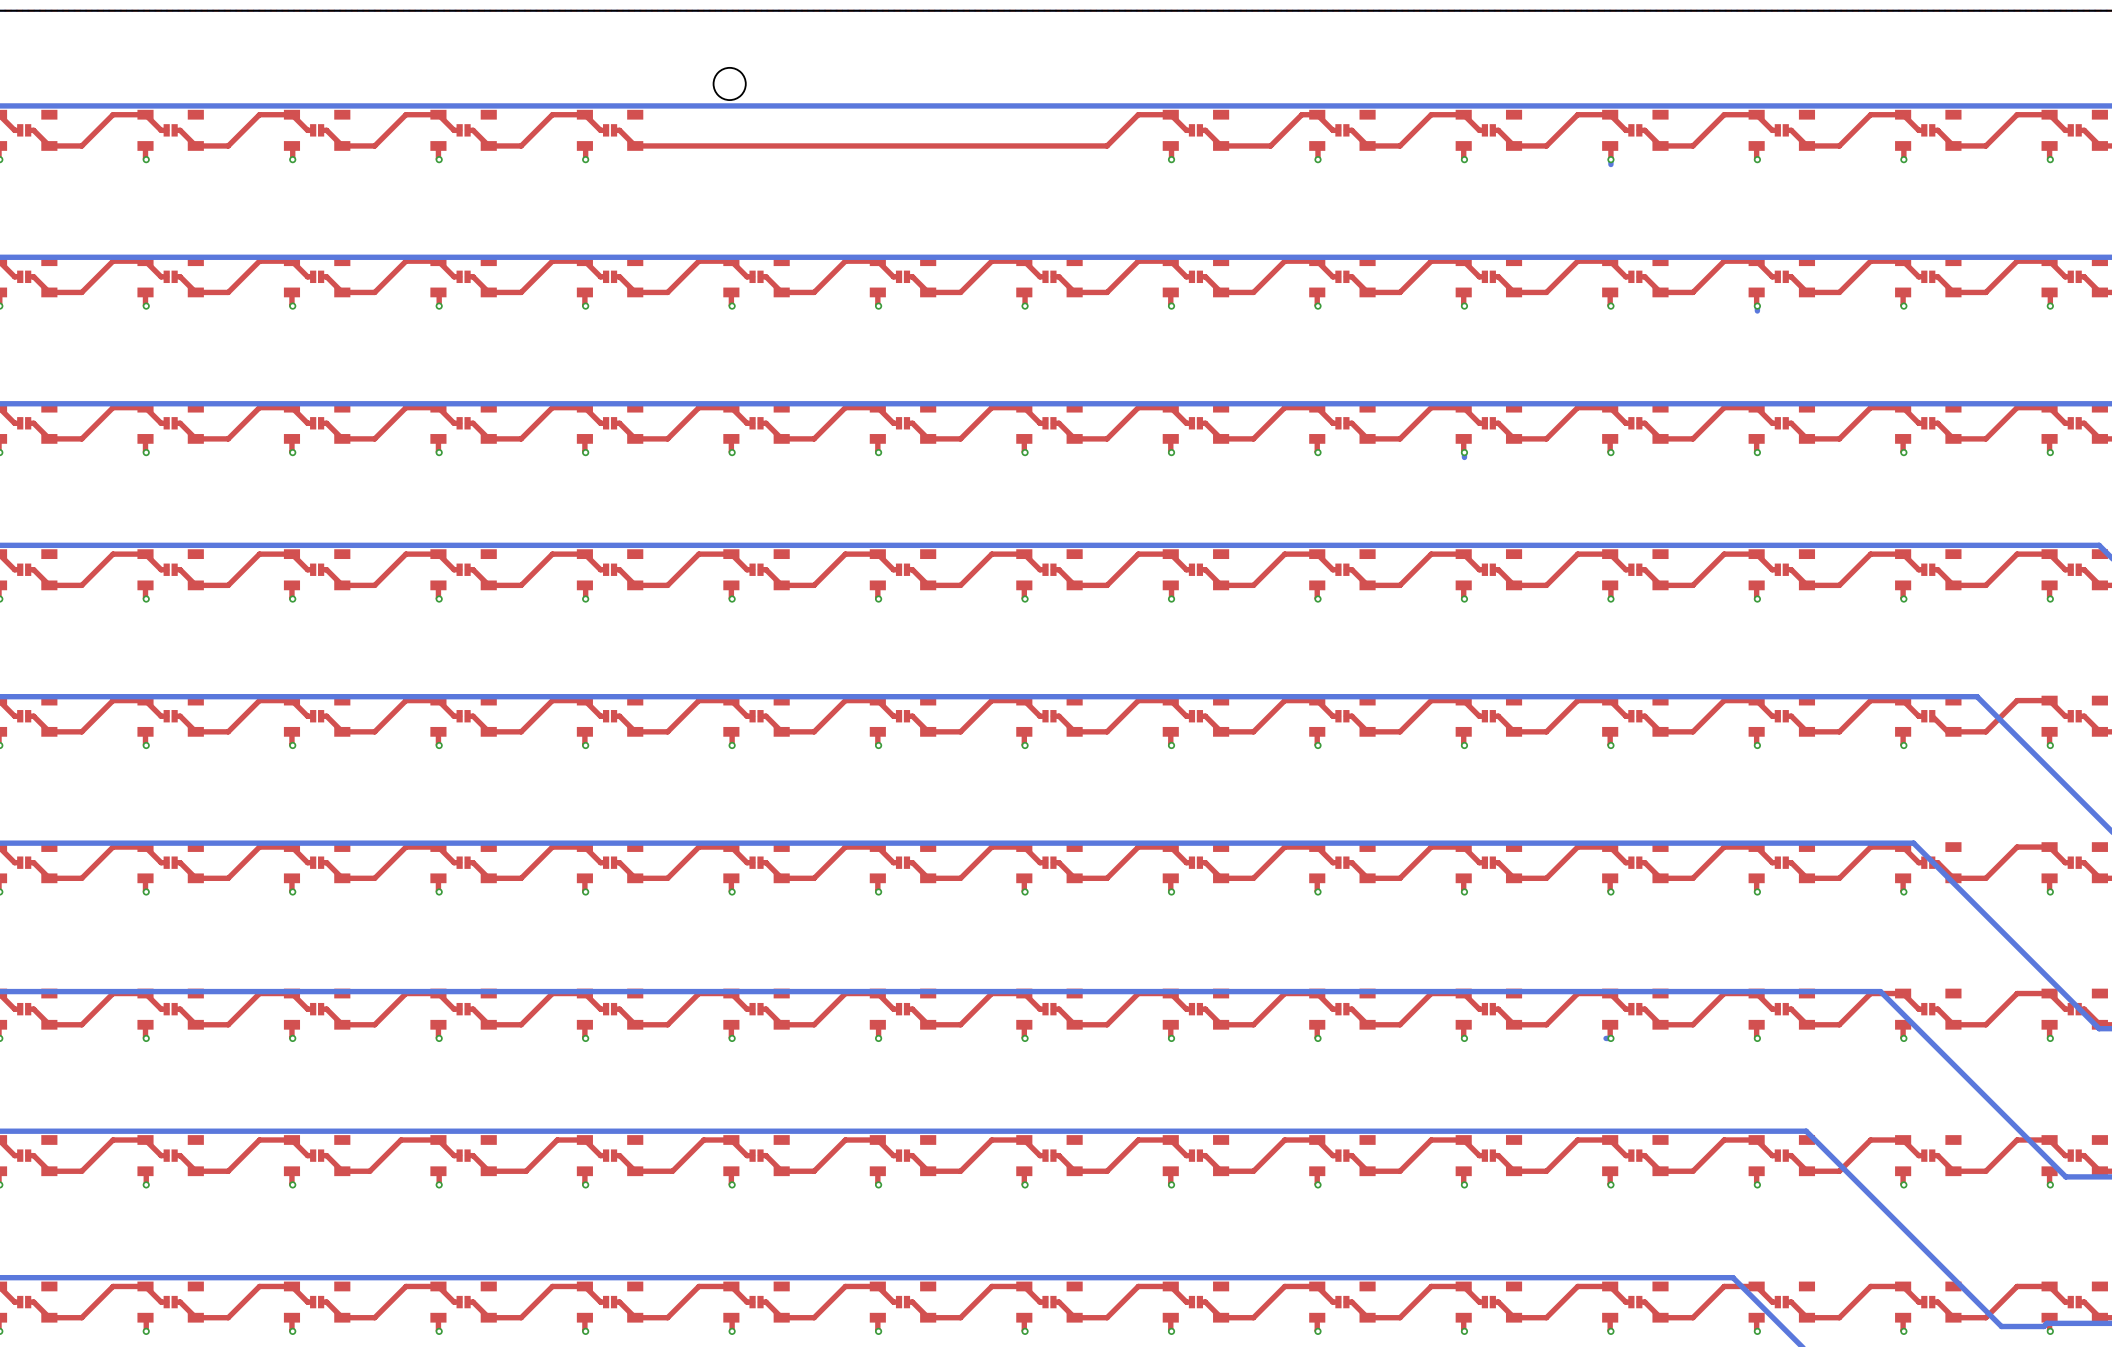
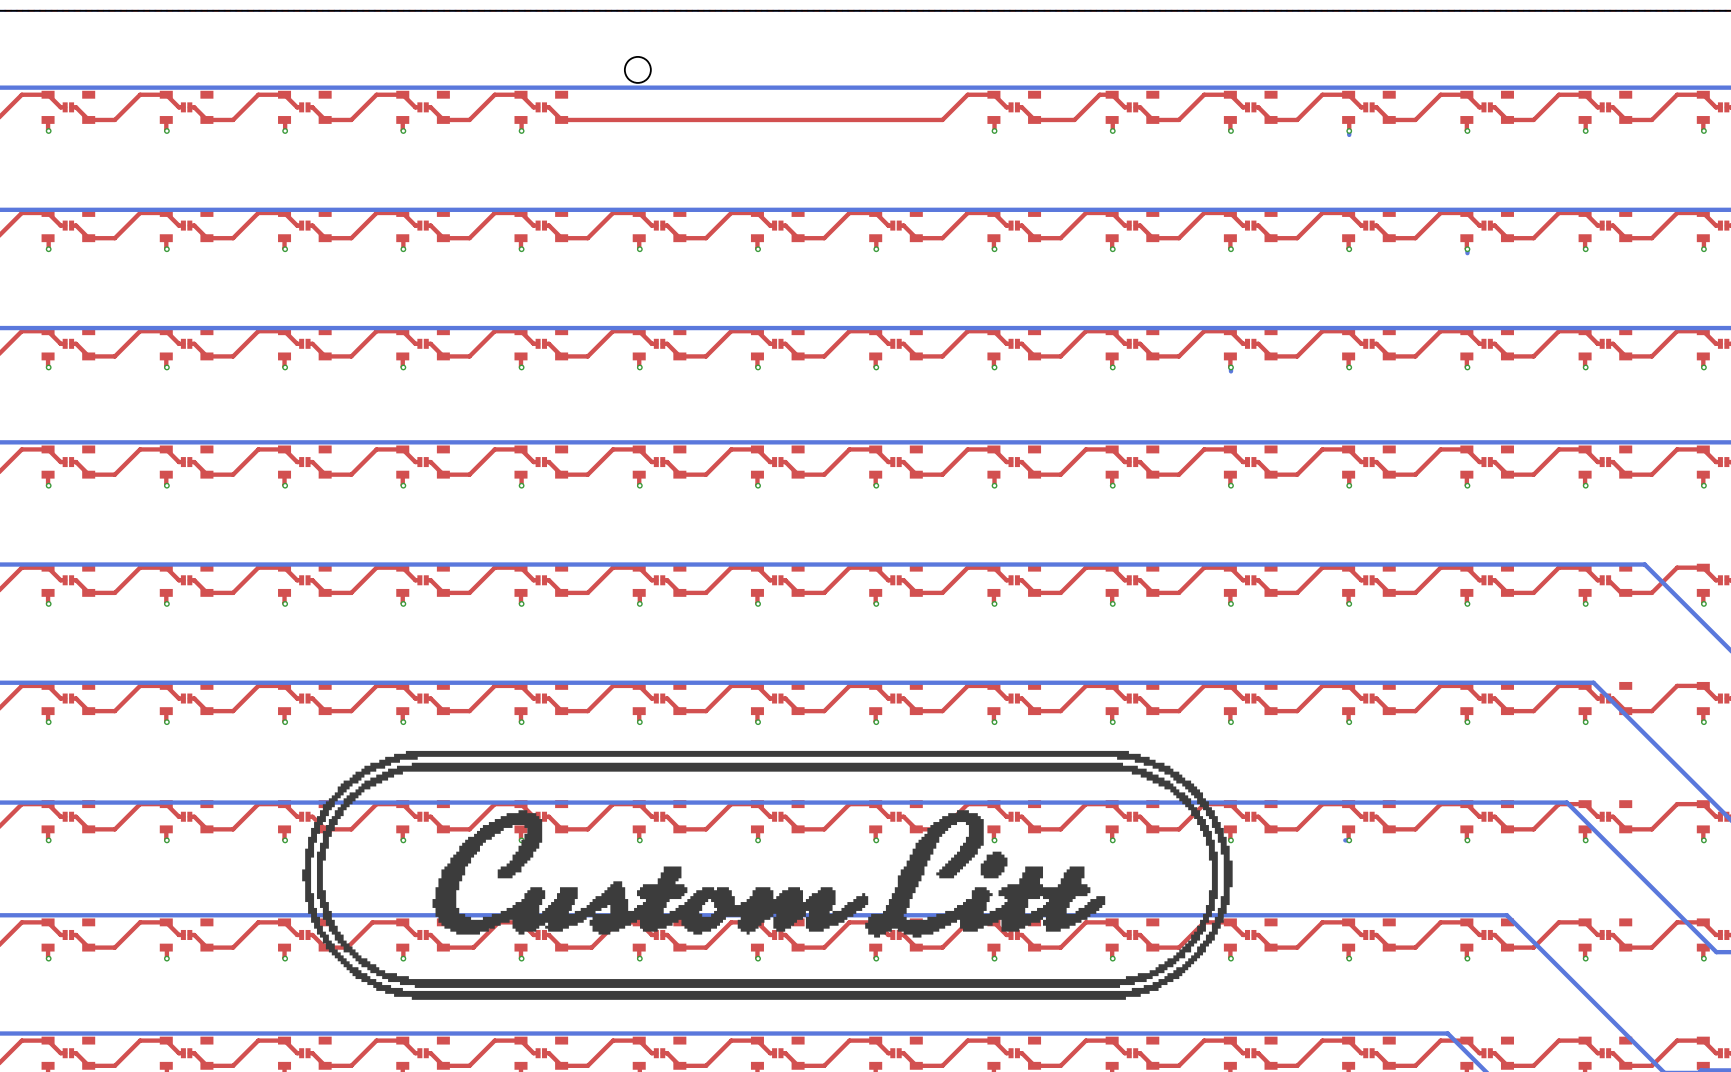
drawing: none -> [302, 750, 1233, 1000]

